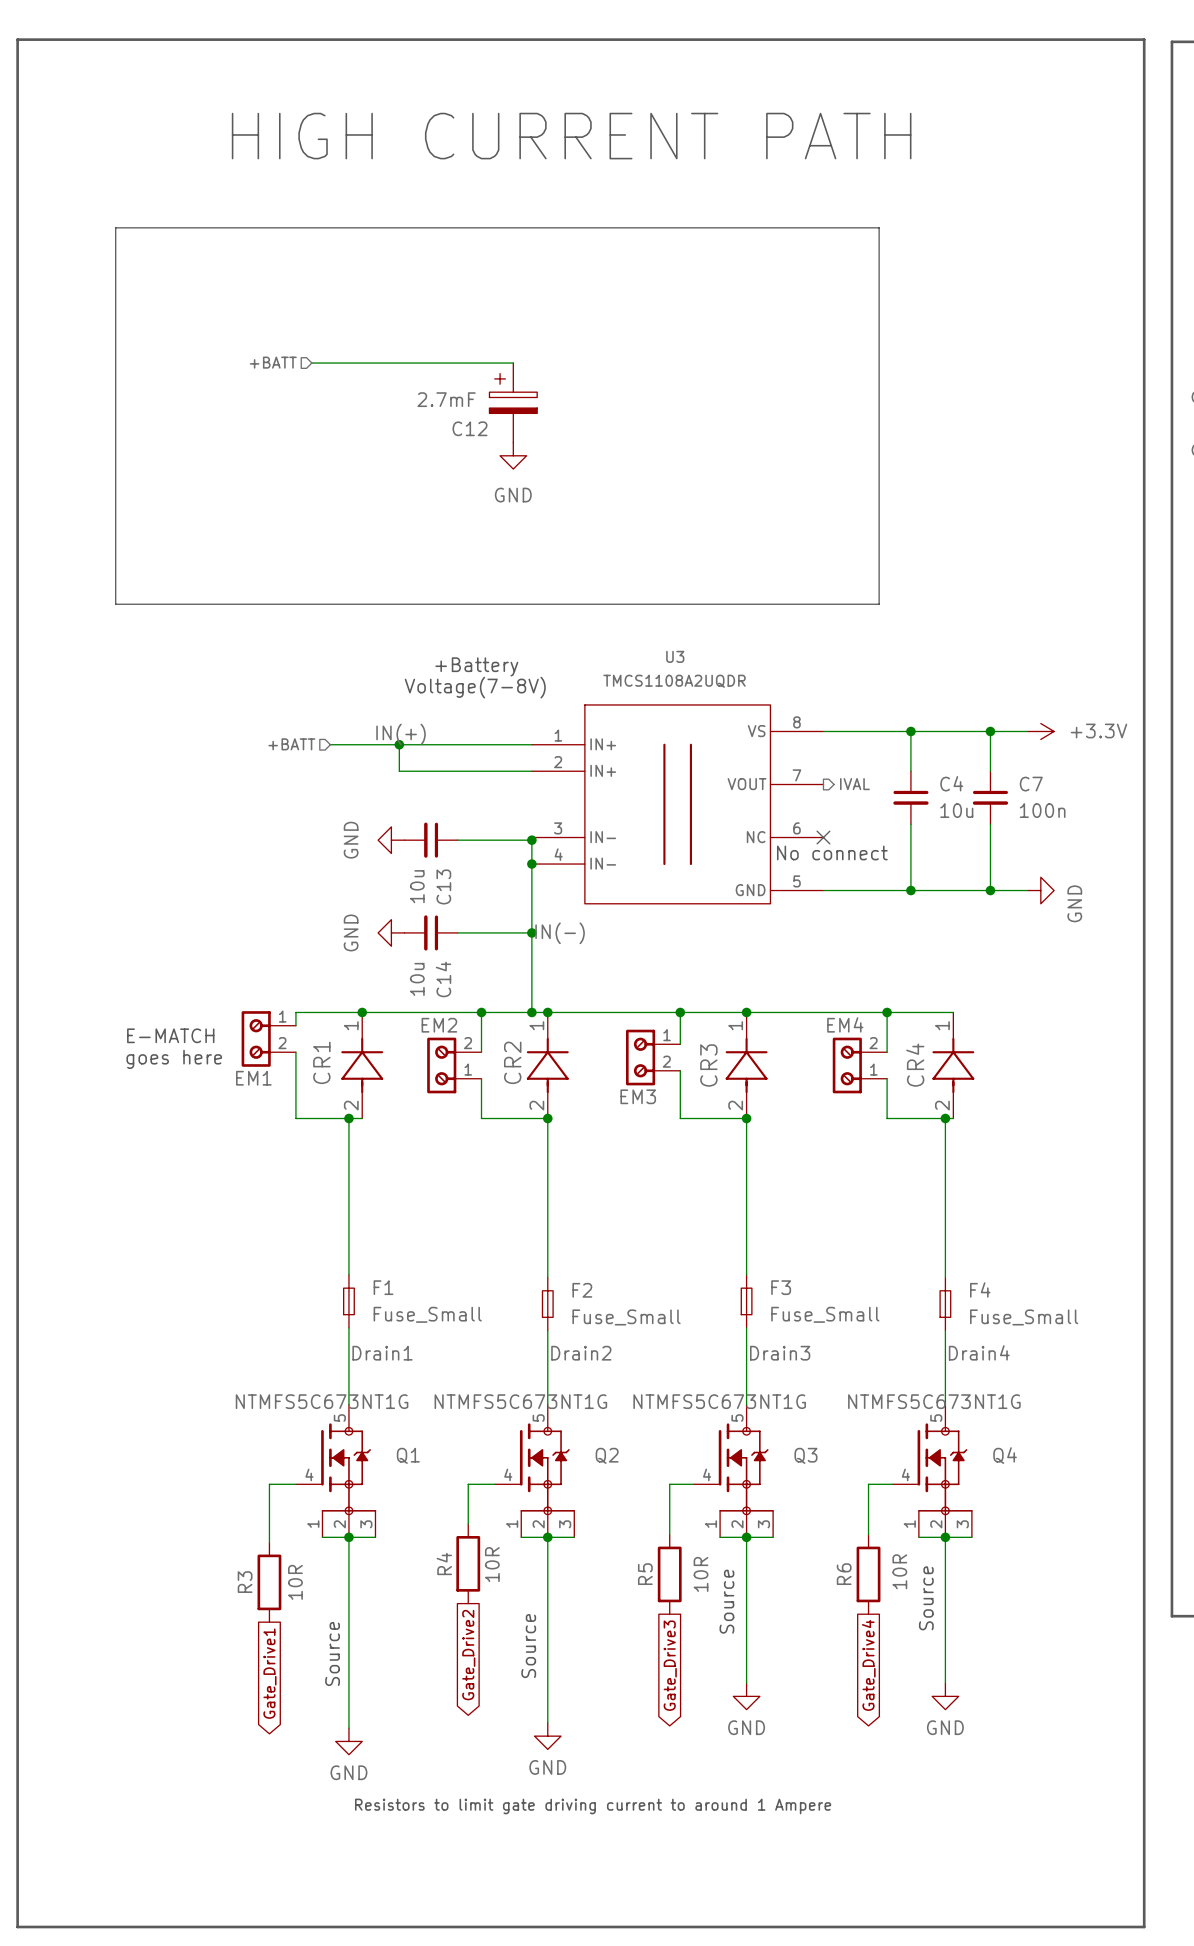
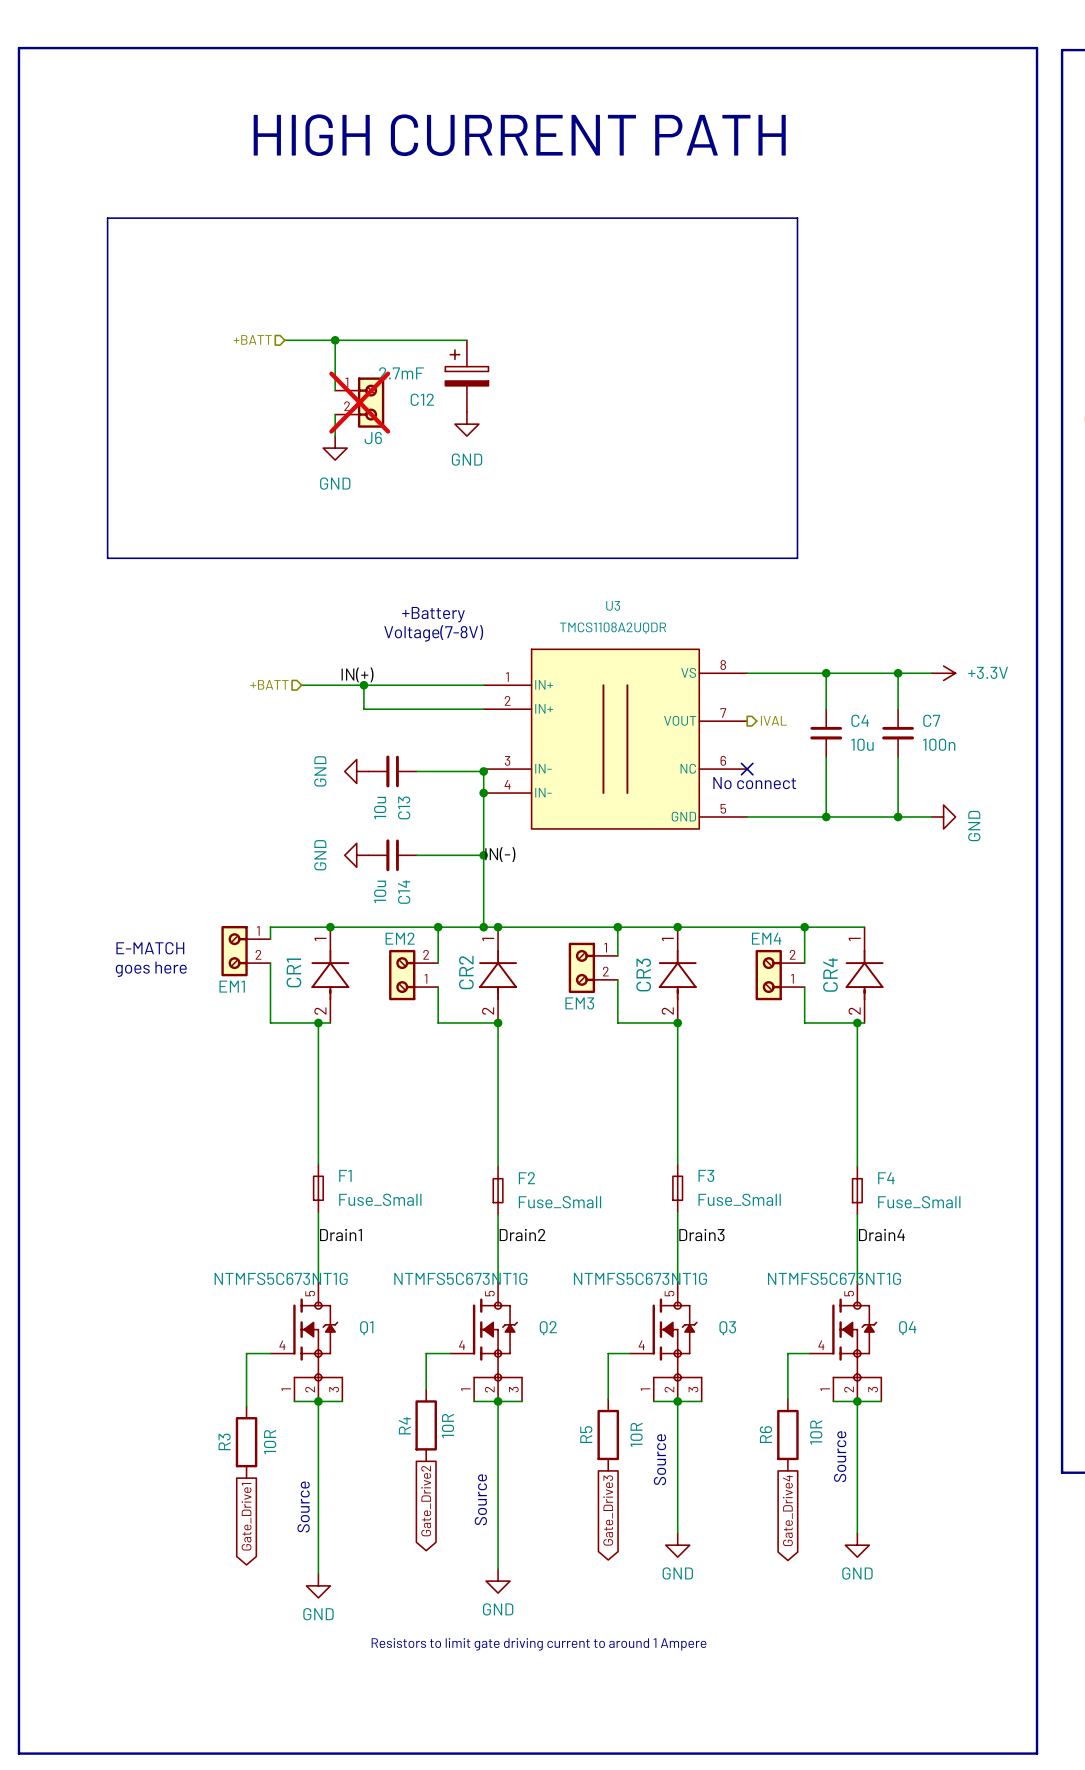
wire: none -> (335, 340) (335, 390)
junction: none -> (335, 340)
J6: none -> (359, 402)
wire: none -> (335, 414) (335, 436)
power symbol: none -> GND (335, 448)

